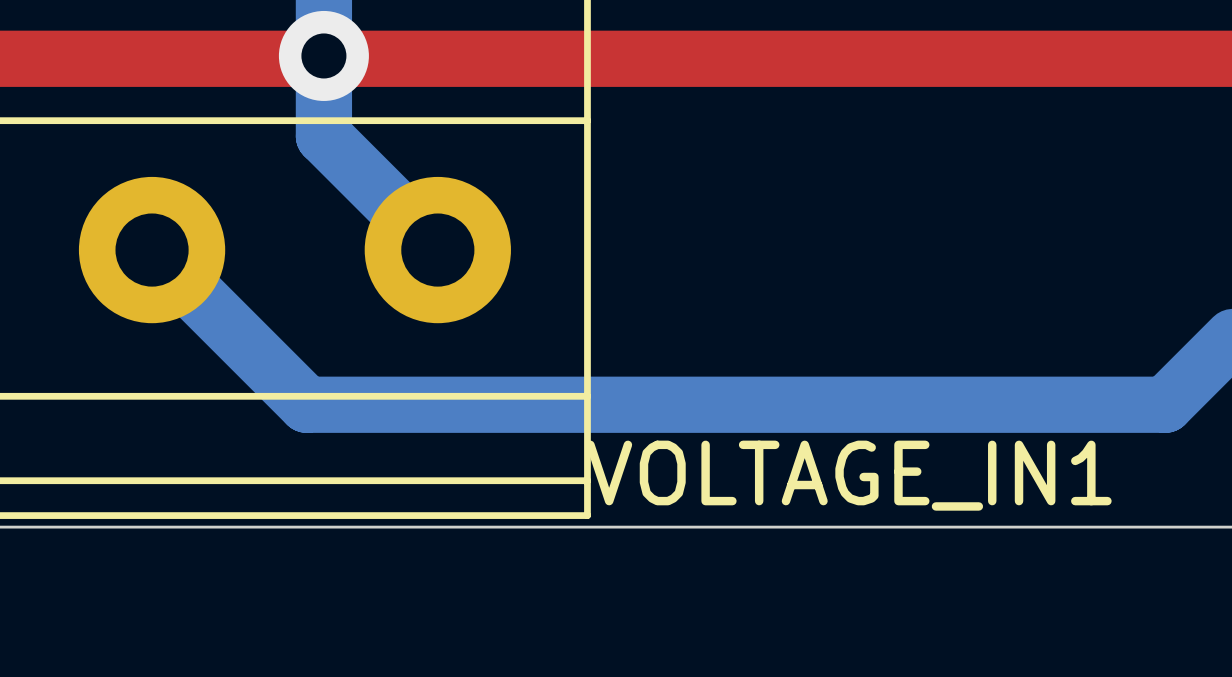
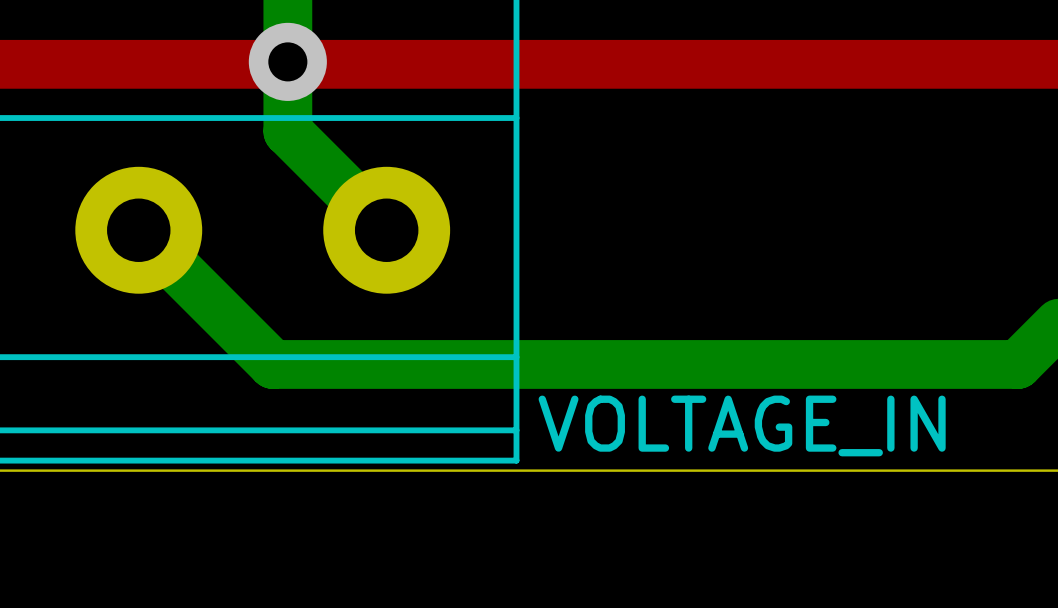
VOLTAGE_IN1 name: VOLTAGE_IN1 (848, 475) -> VOLTAGE_IN (742, 425)

